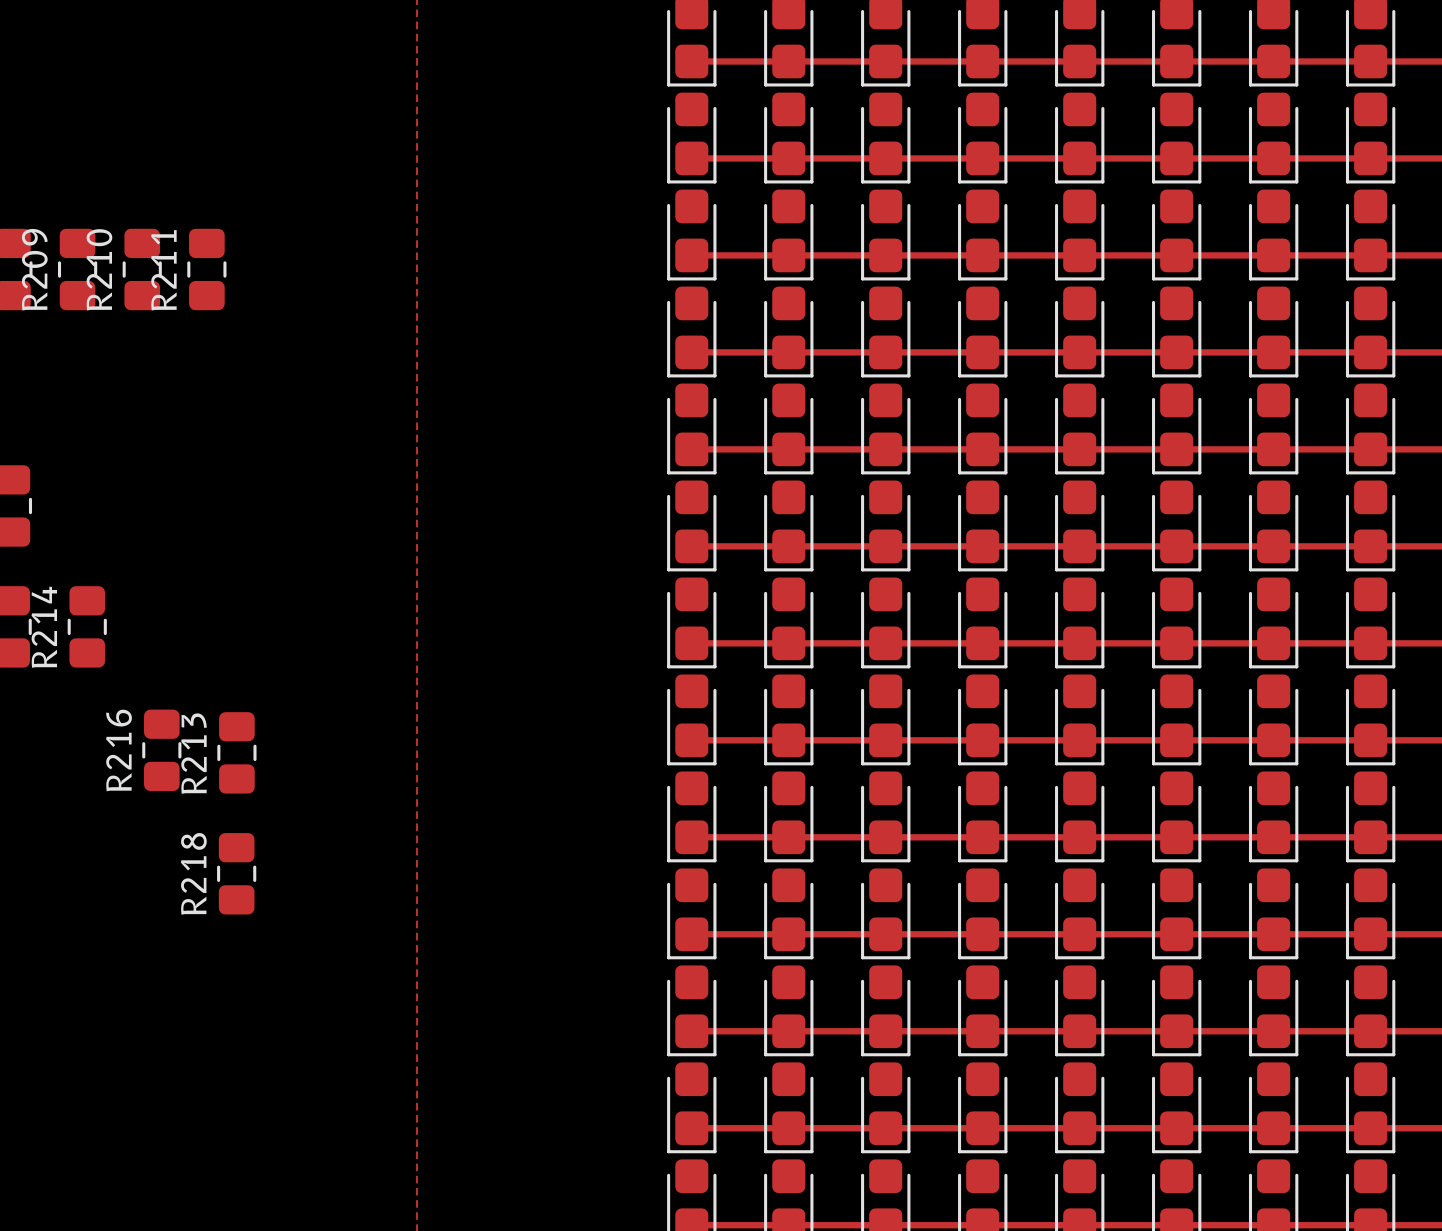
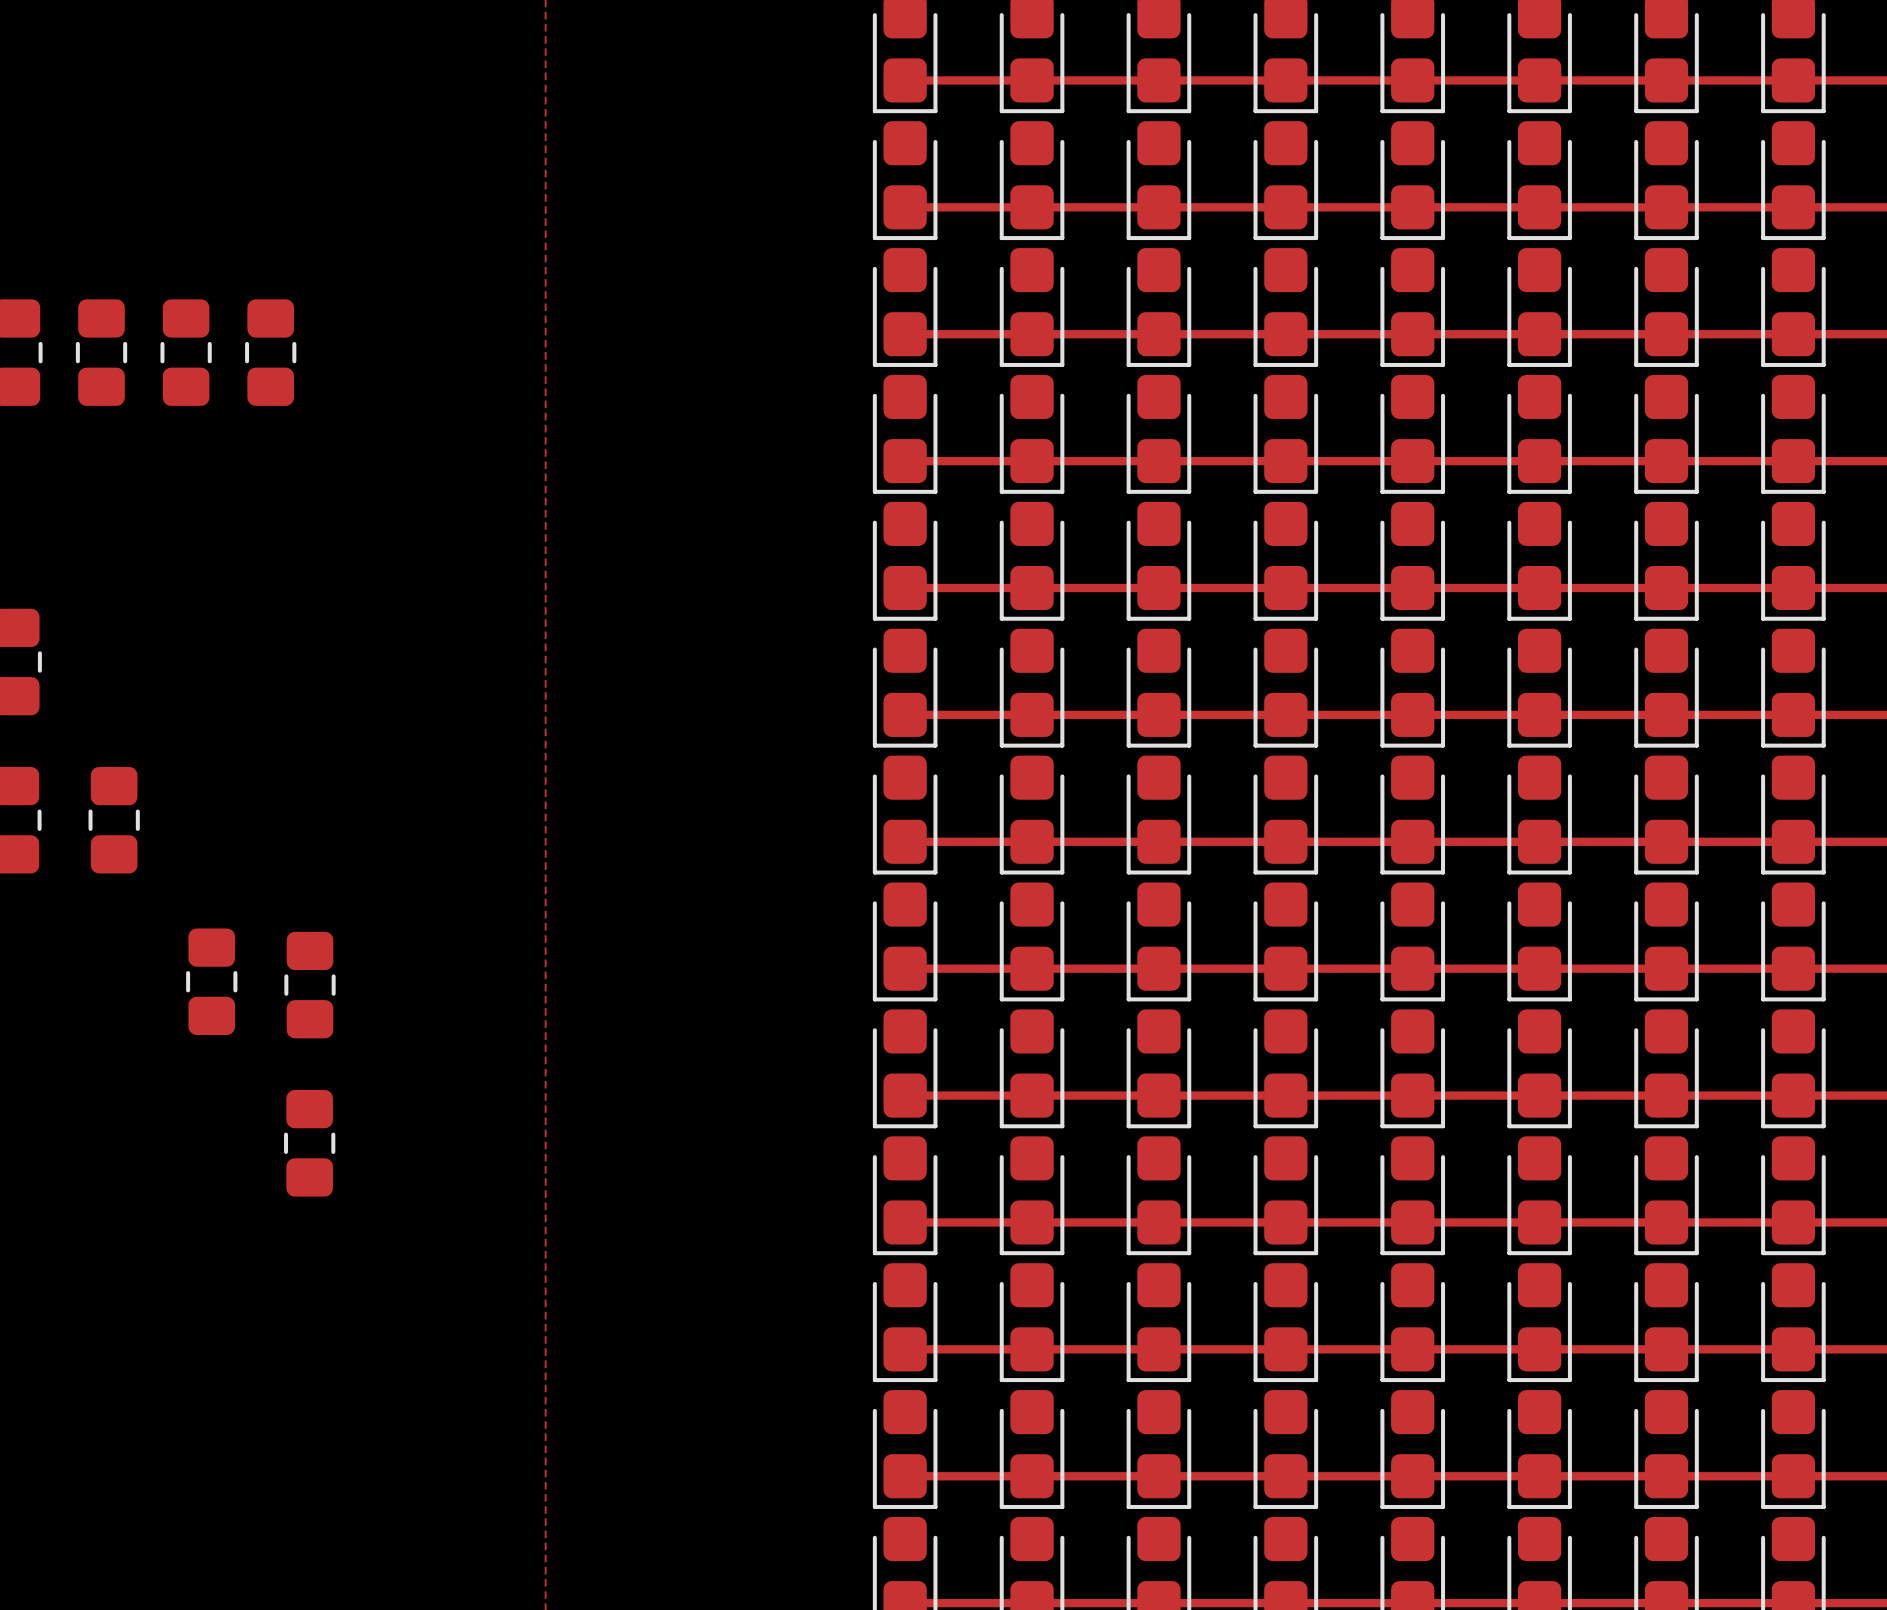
R209 name: R209 (34, 269) -> none
R210 name: R210 (99, 269) -> none
R211 name: R211 (163, 270) -> none
R214 name: R214 (44, 627) -> none
R216 name: R216 (119, 750) -> none
R213 name: R213 (193, 753) -> none
R218 name: R218 (193, 873) -> none

